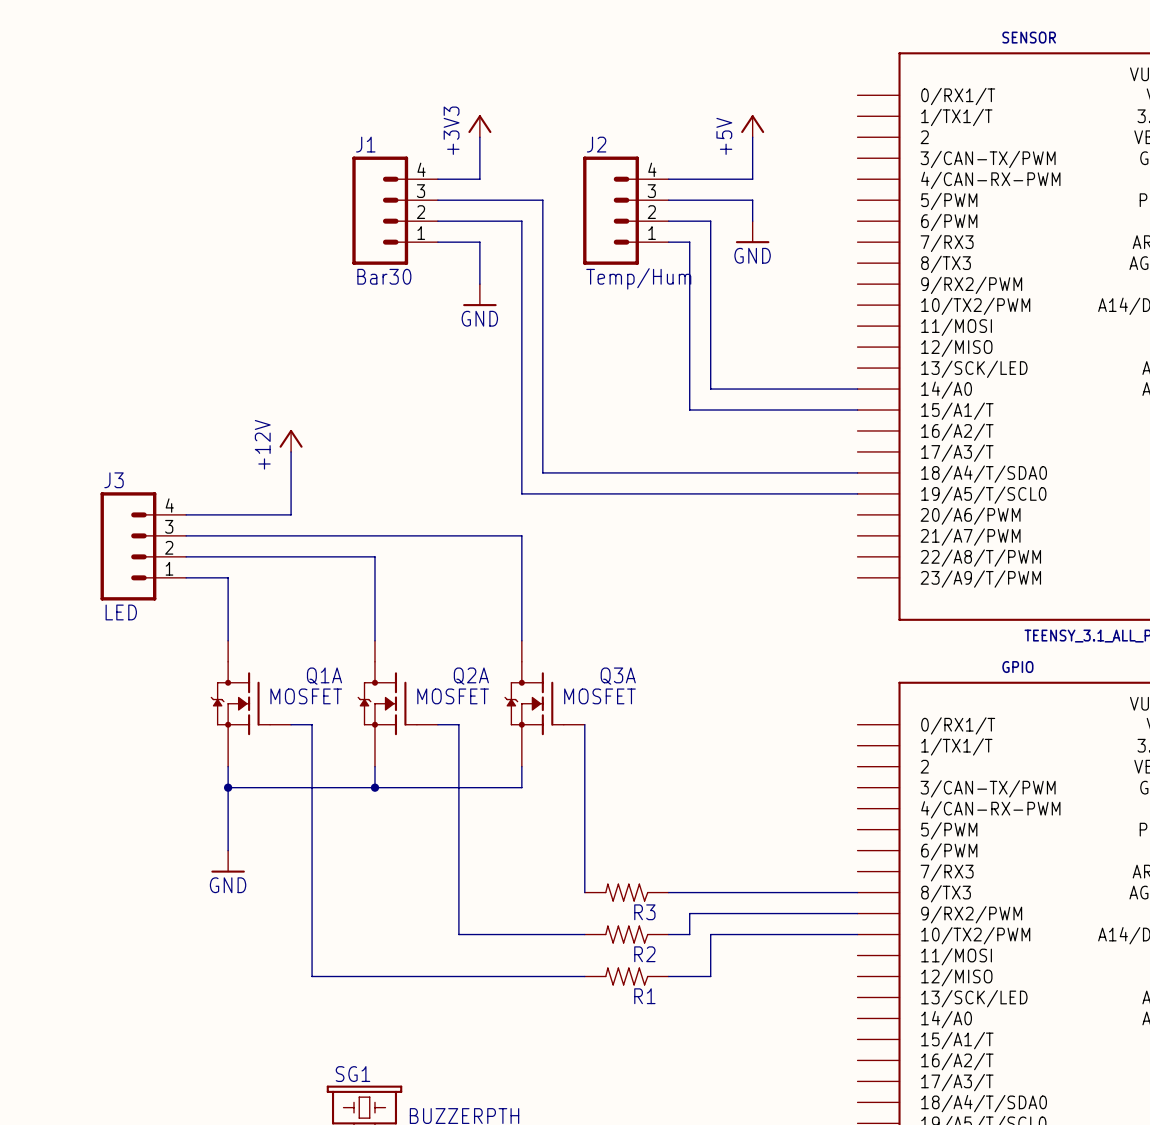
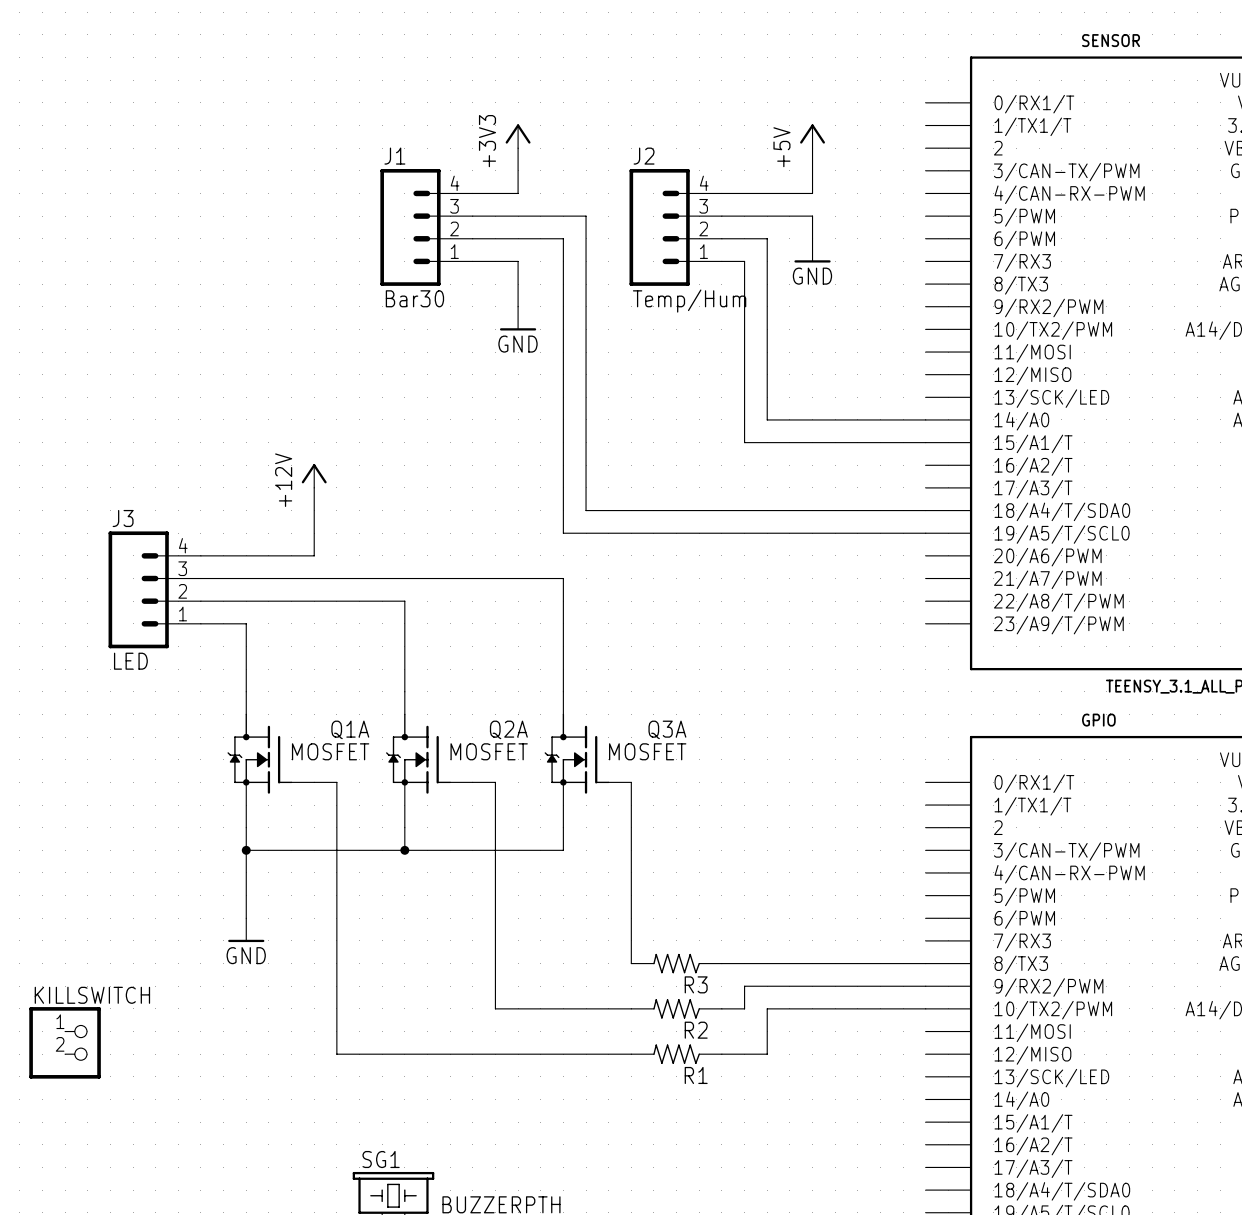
KILLSWITCH: none -> (65, 1042)

